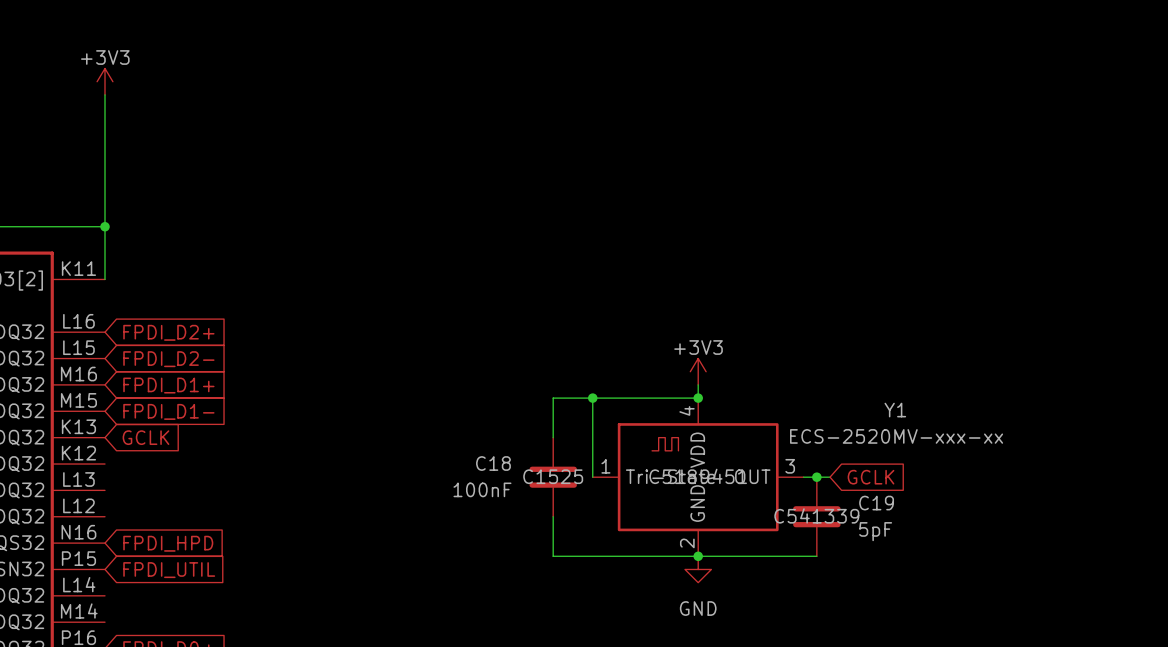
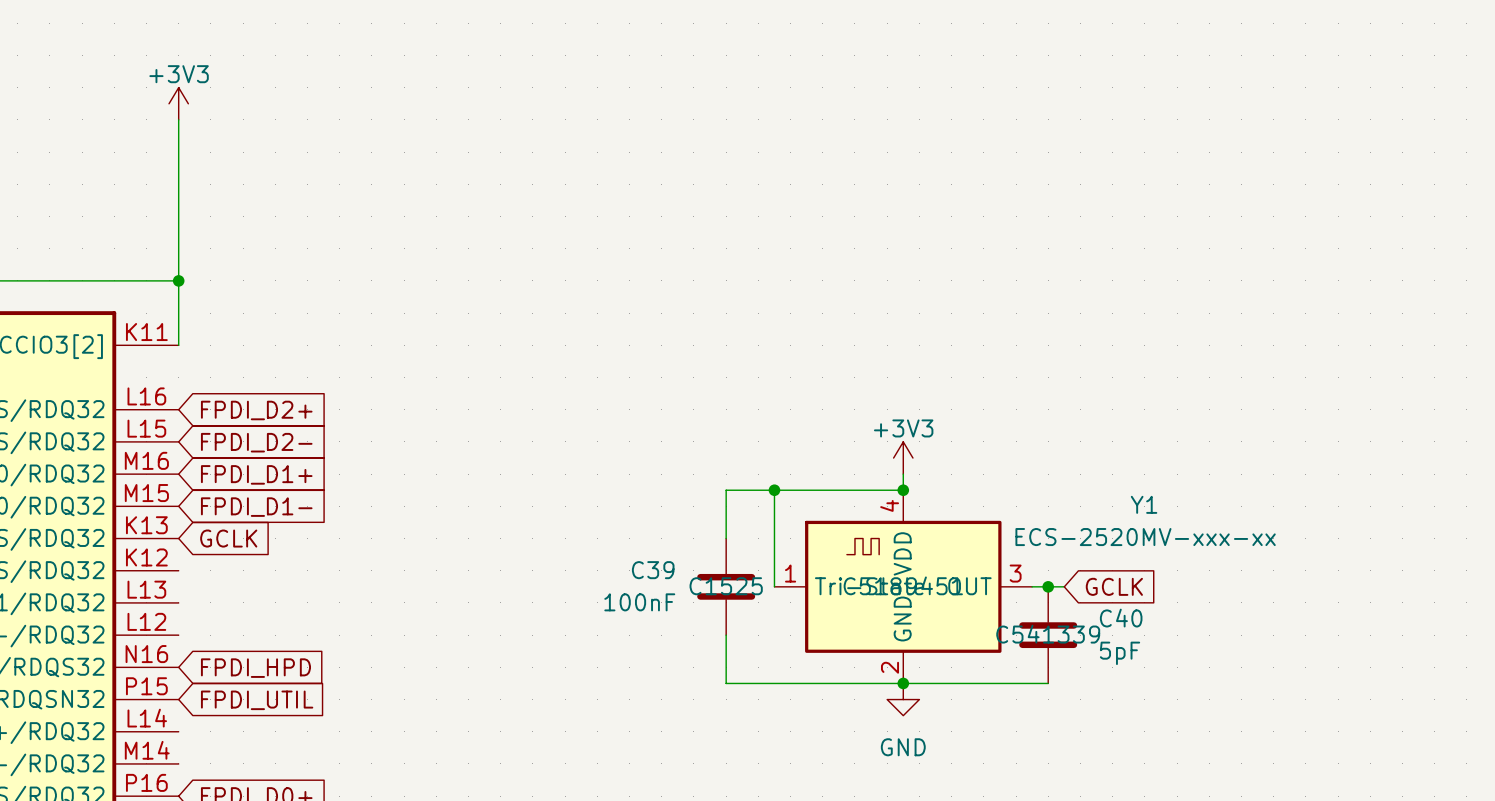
C18 name: C18 (493, 463) -> C39 (653, 570)
C19 name: C19 (876, 503) -> C40 (1121, 618)

